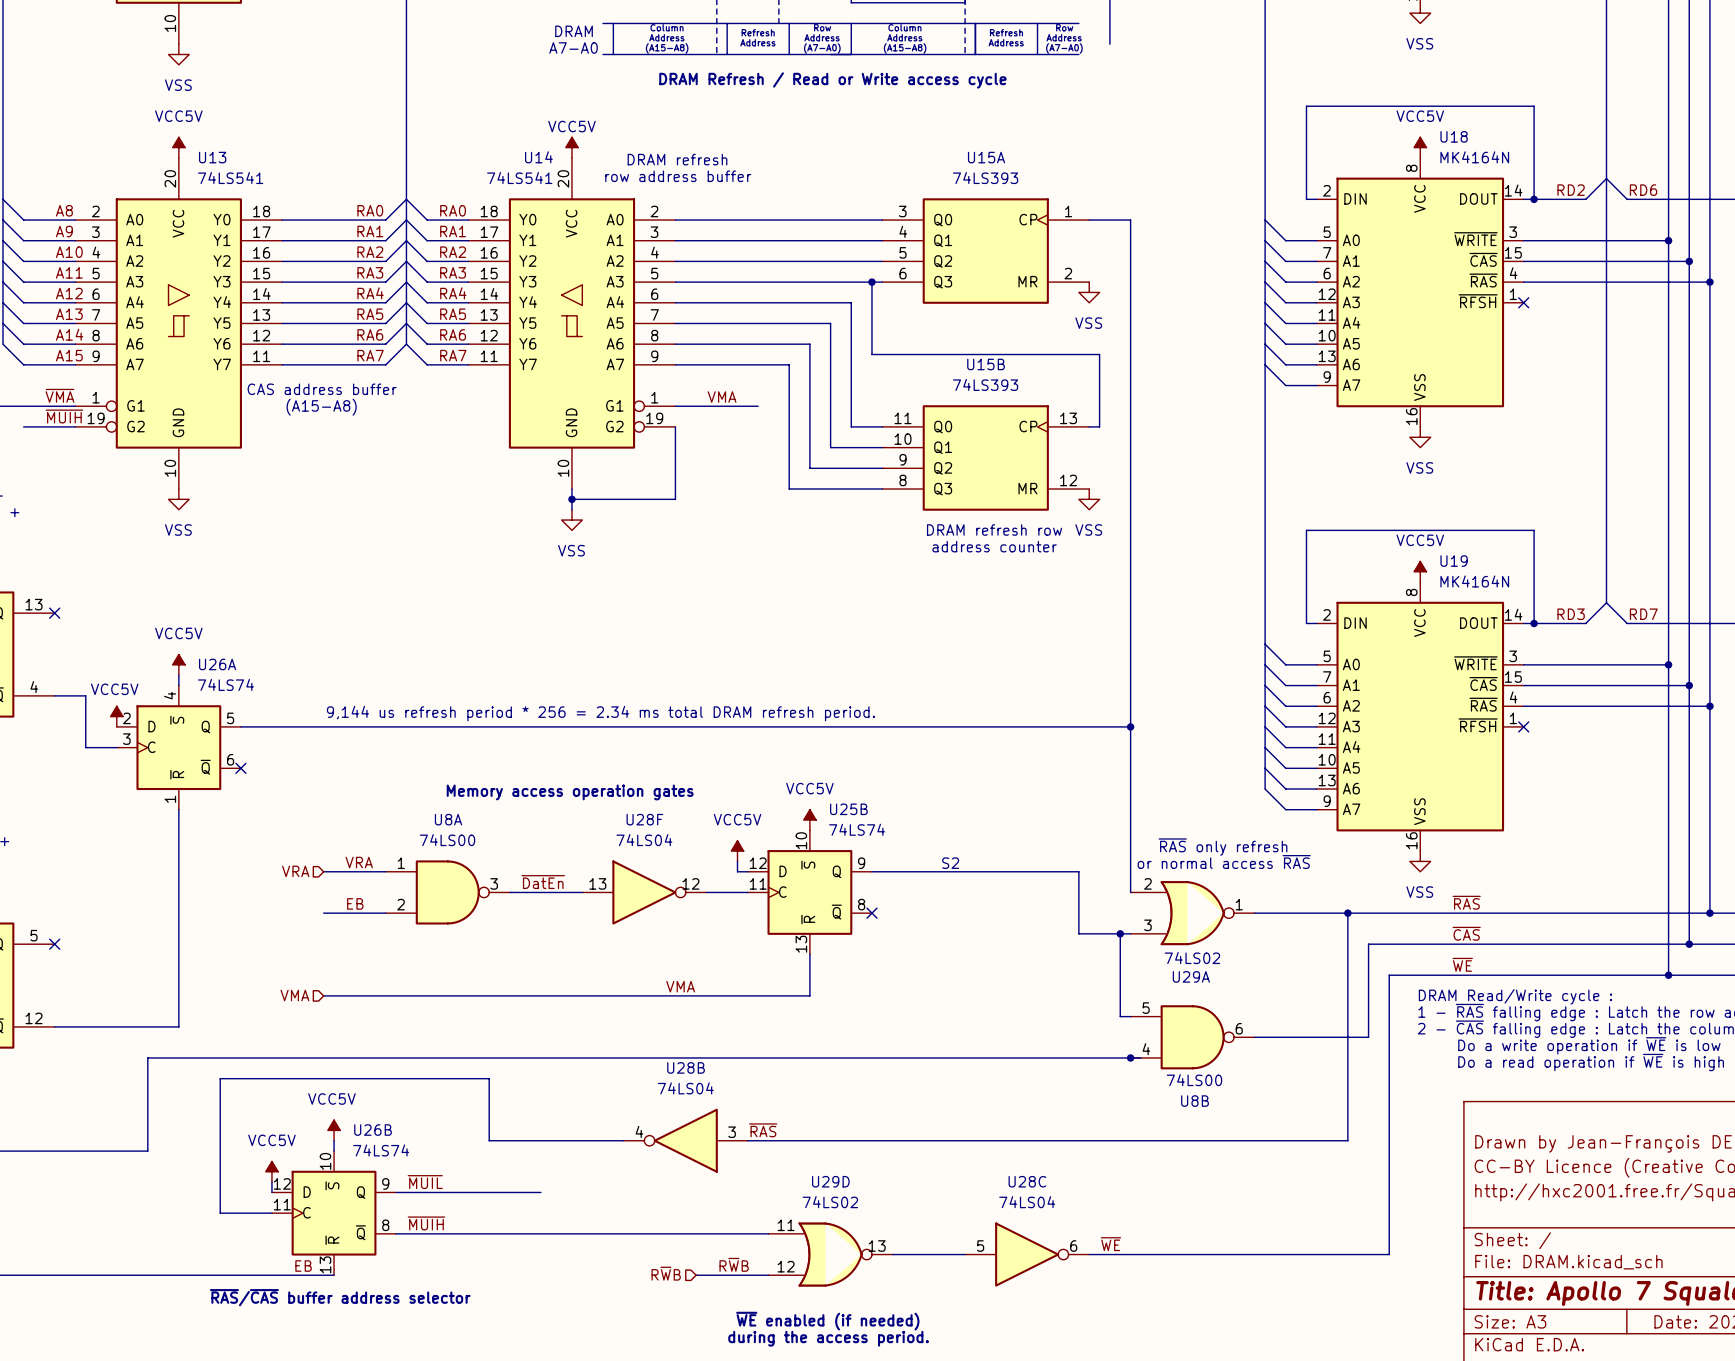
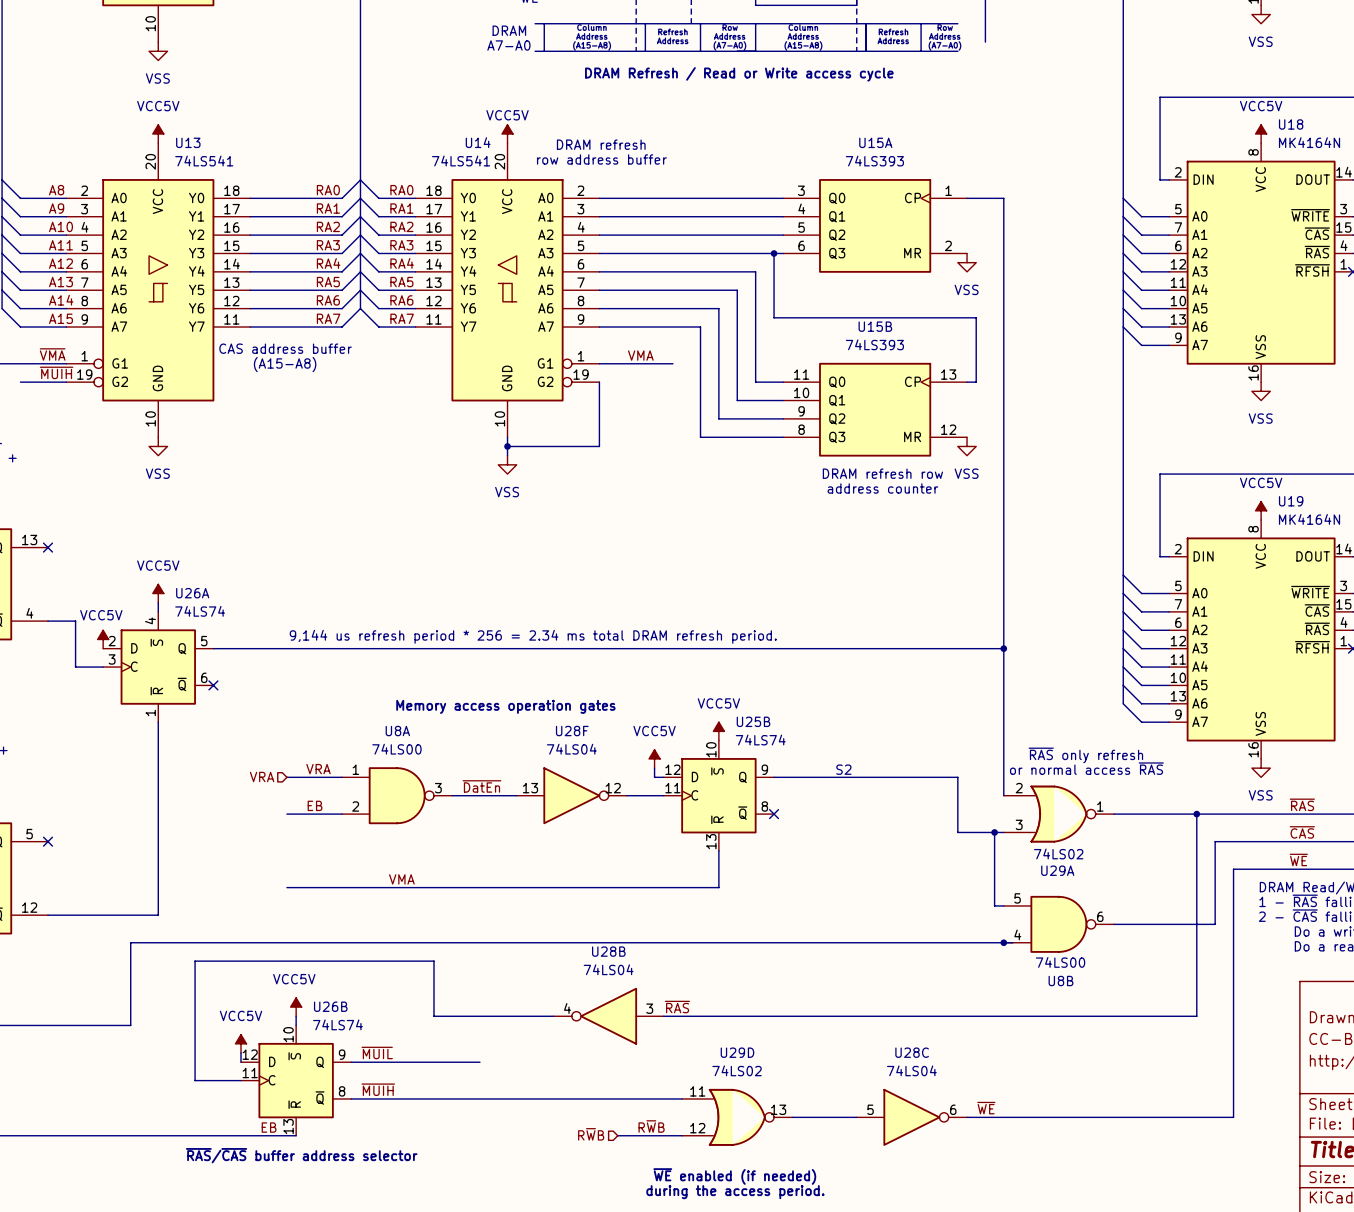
label: none -> VMA (401, 879)
label: VMA (680, 986) -> none
hierarchical label: VMA (294, 995) -> none

